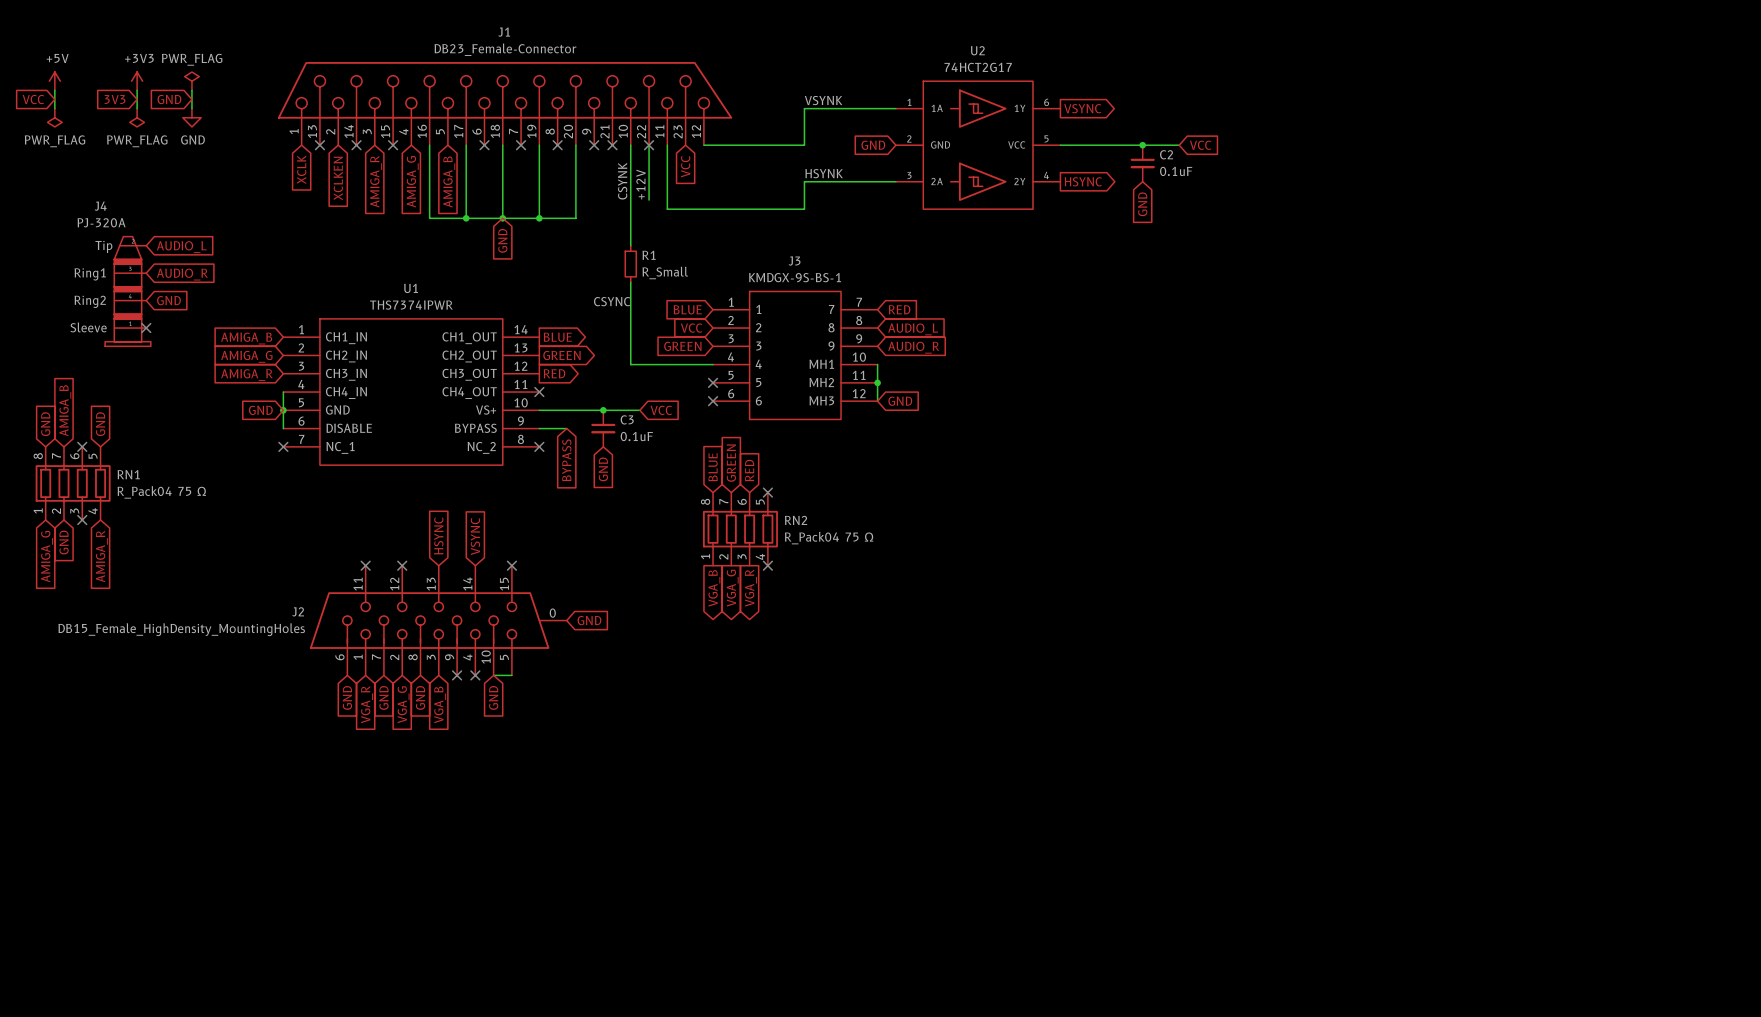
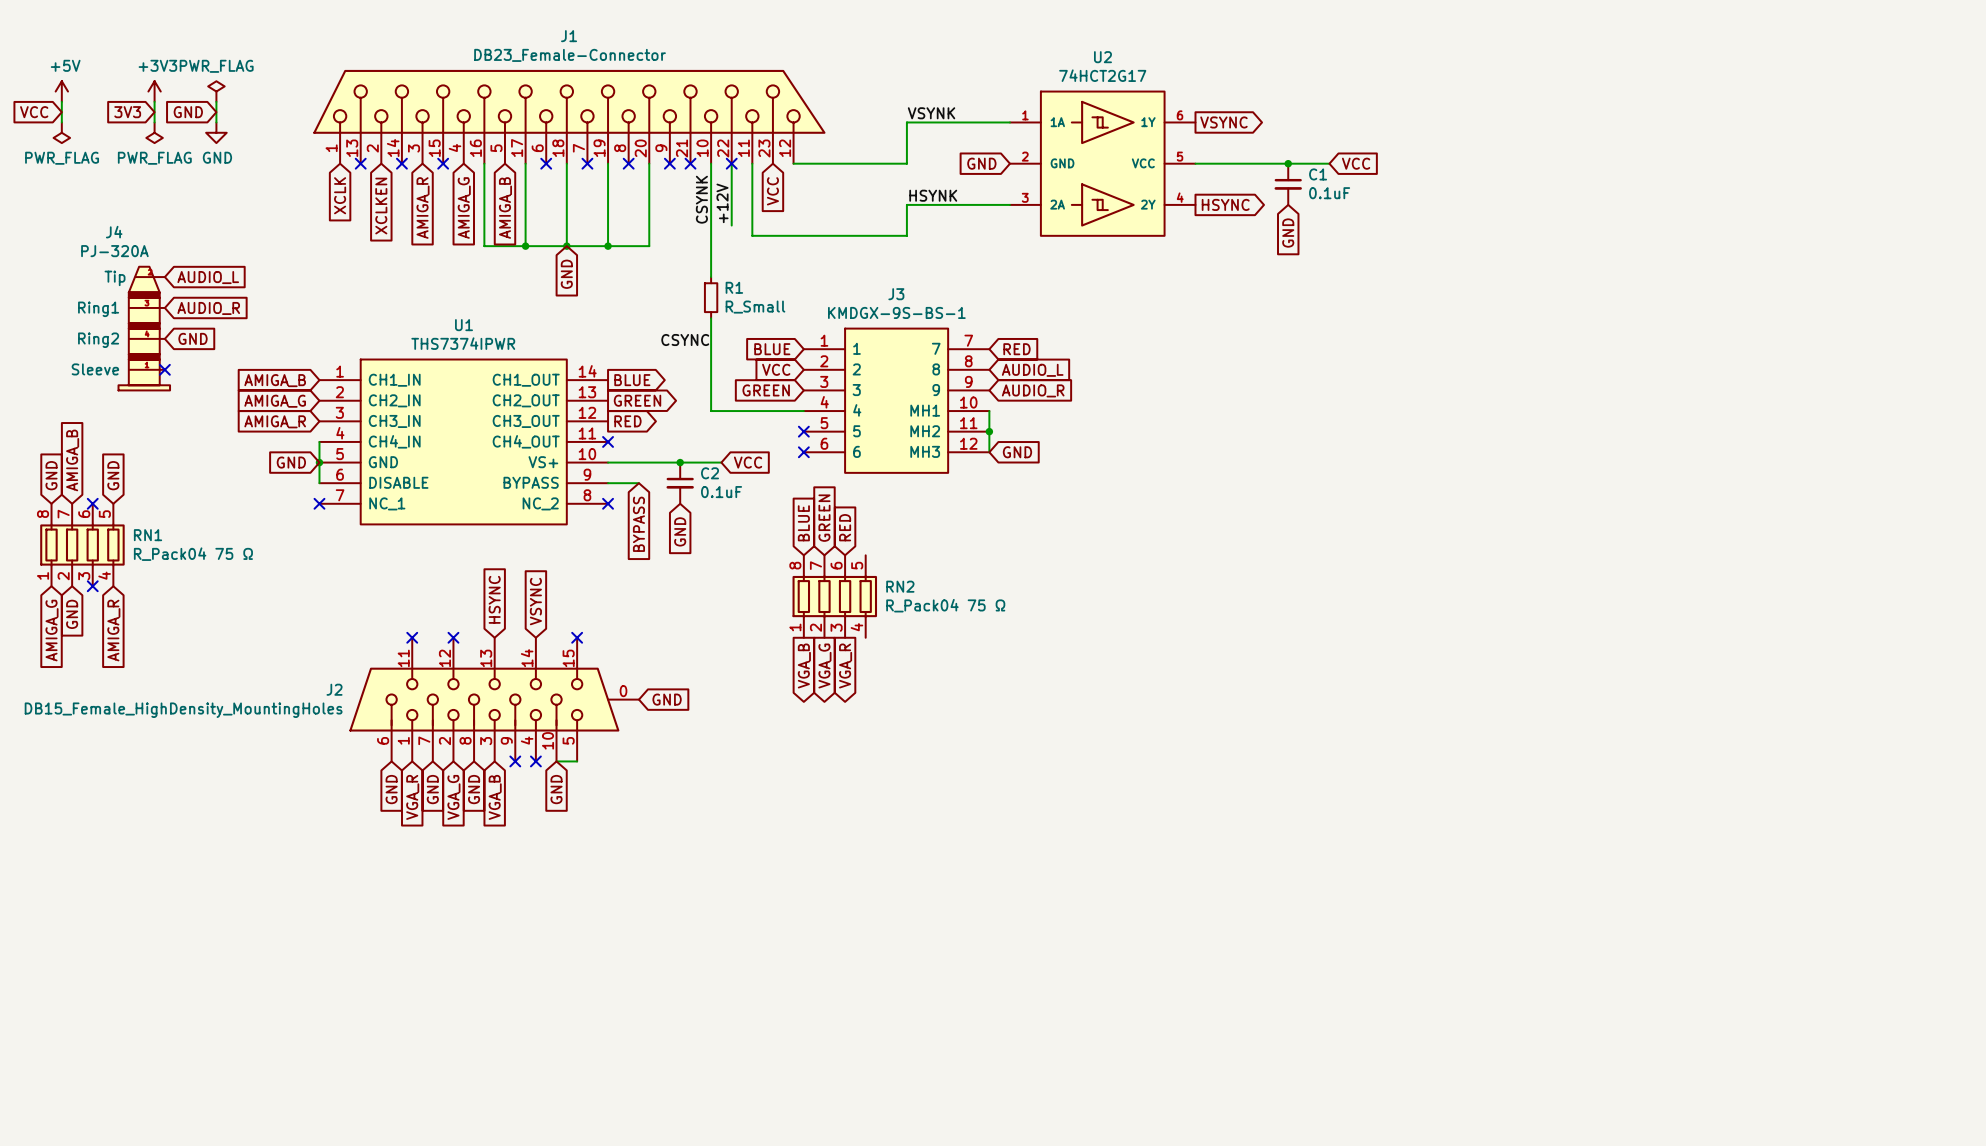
C2 name: C2 (1166, 154) -> C1 (1318, 174)
C3 name: C3 (627, 419) -> C2 (710, 473)
no-connect mark: (767, 492) -> none
no-connect mark: (767, 565) -> none

